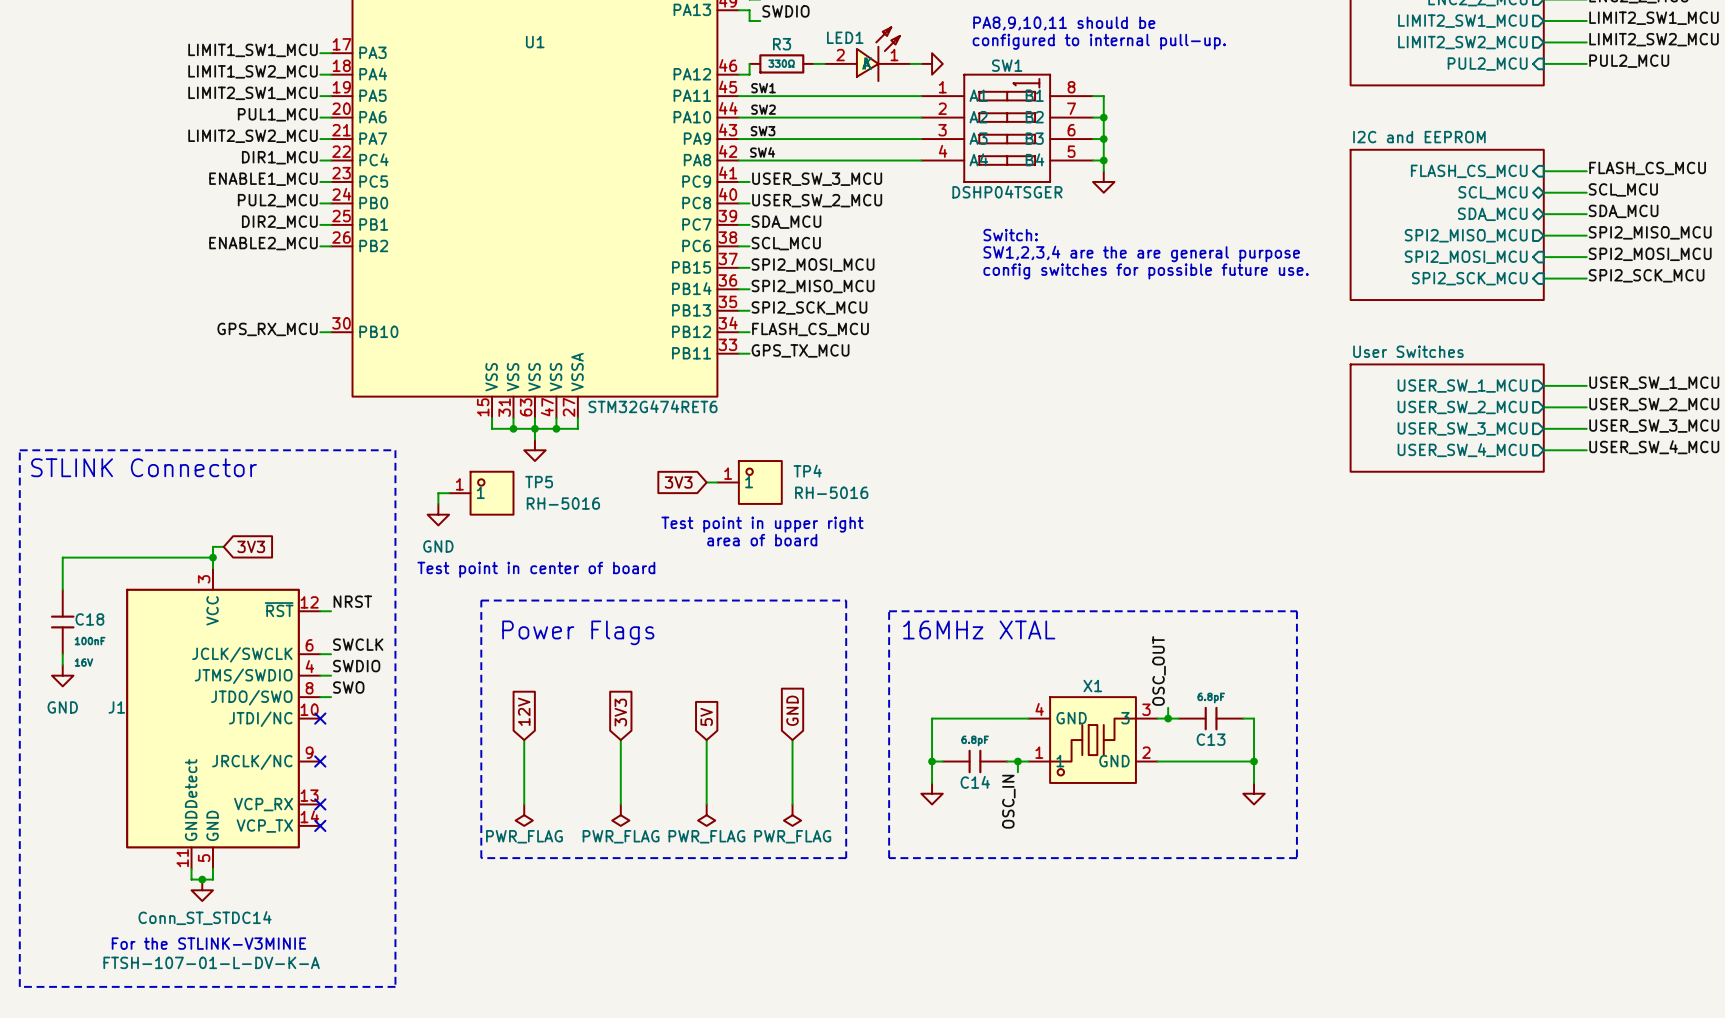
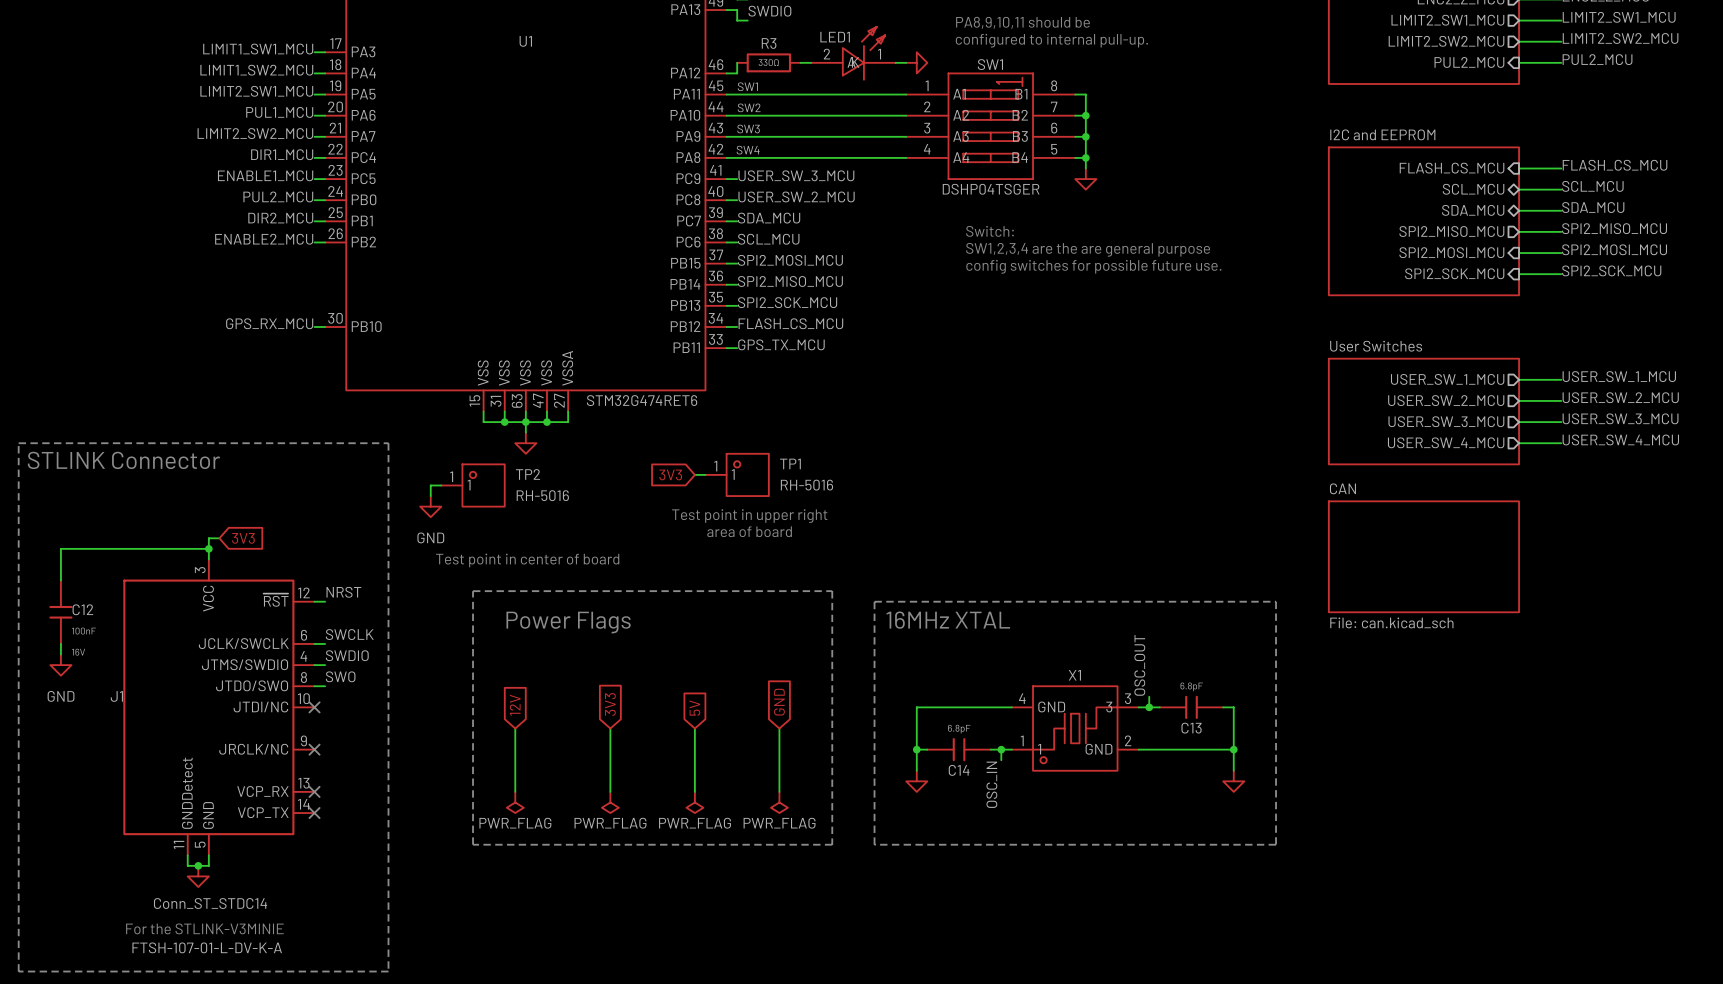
TP4 name: TP4 (807, 471) -> TP1 (790, 463)
TP5 name: TP5 (539, 482) -> TP2 (527, 474)
sheet CAN: none -> File: can.kicad_sch (1423, 556)
C18 name: C18 (89, 619) -> C12 (82, 609)

